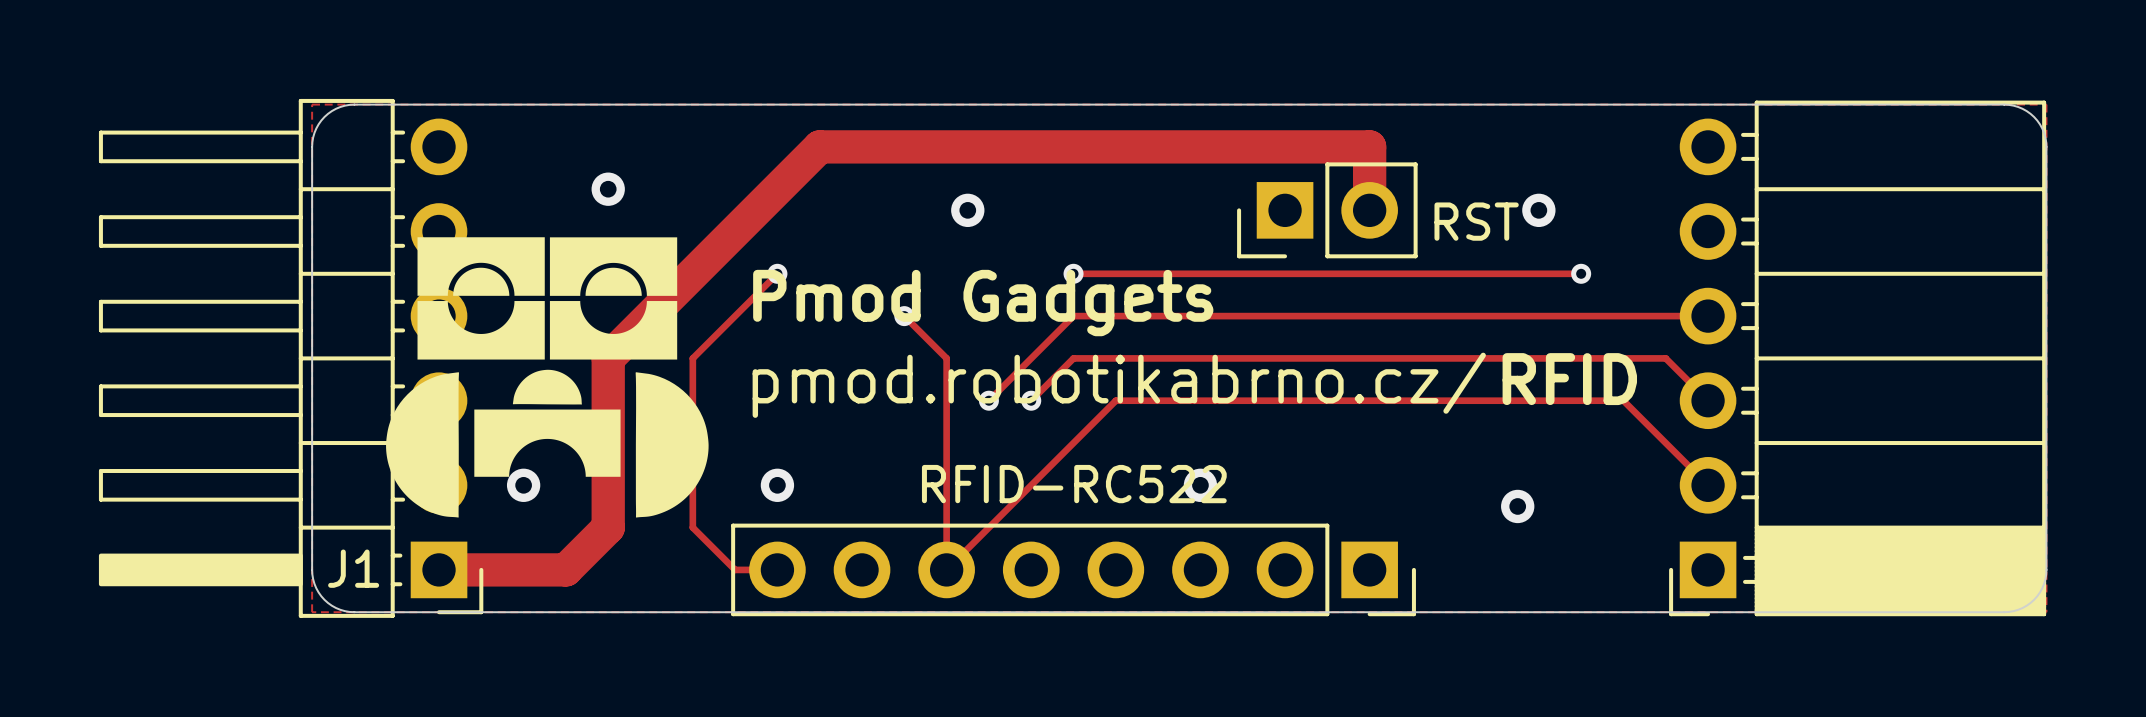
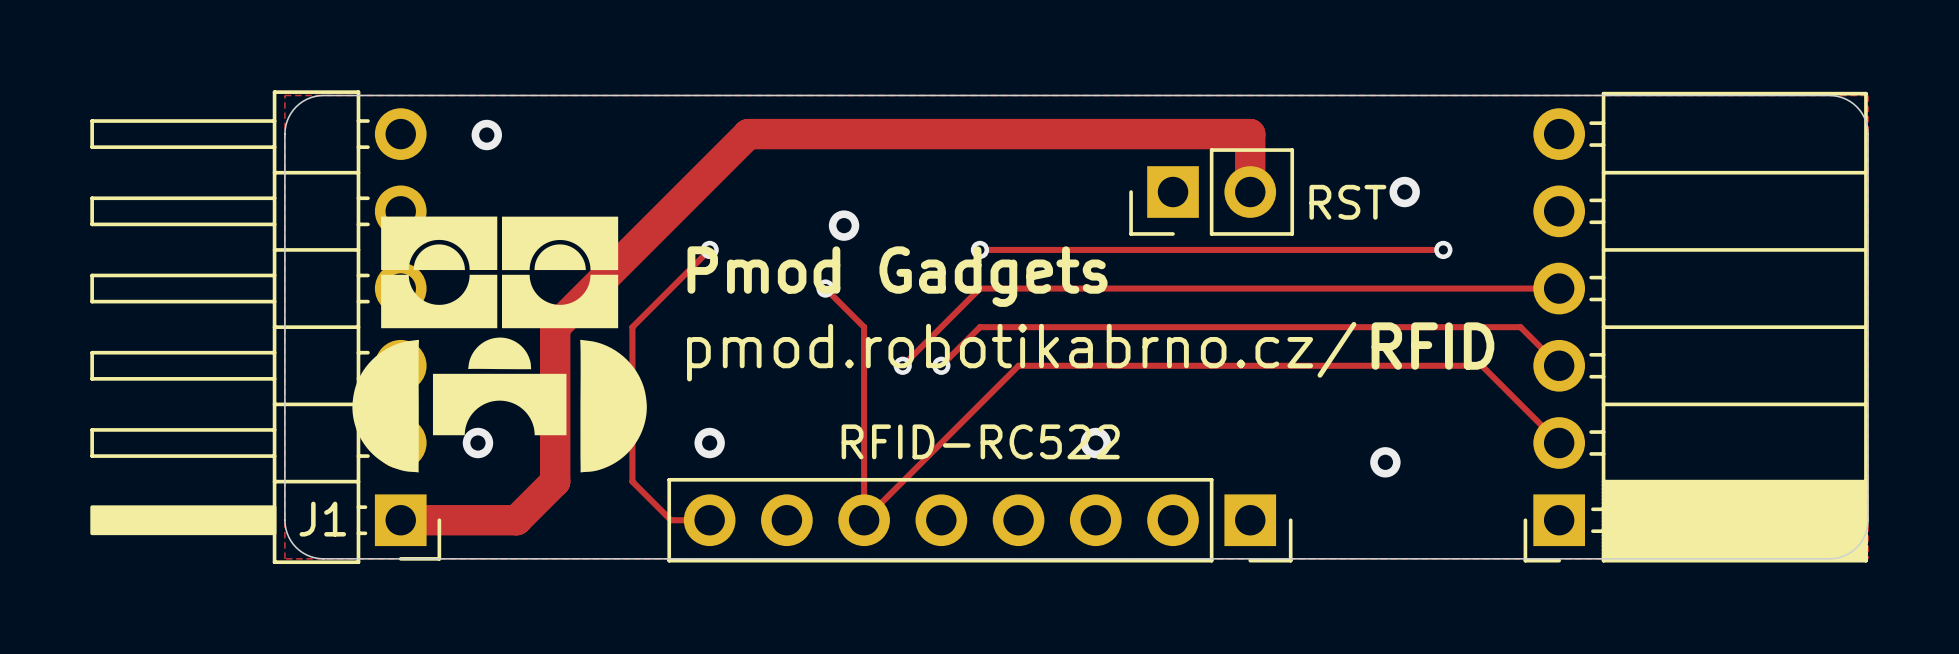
via position: (608, 189) -> (486, 135)
via position: (967, 210) -> (844, 225)

